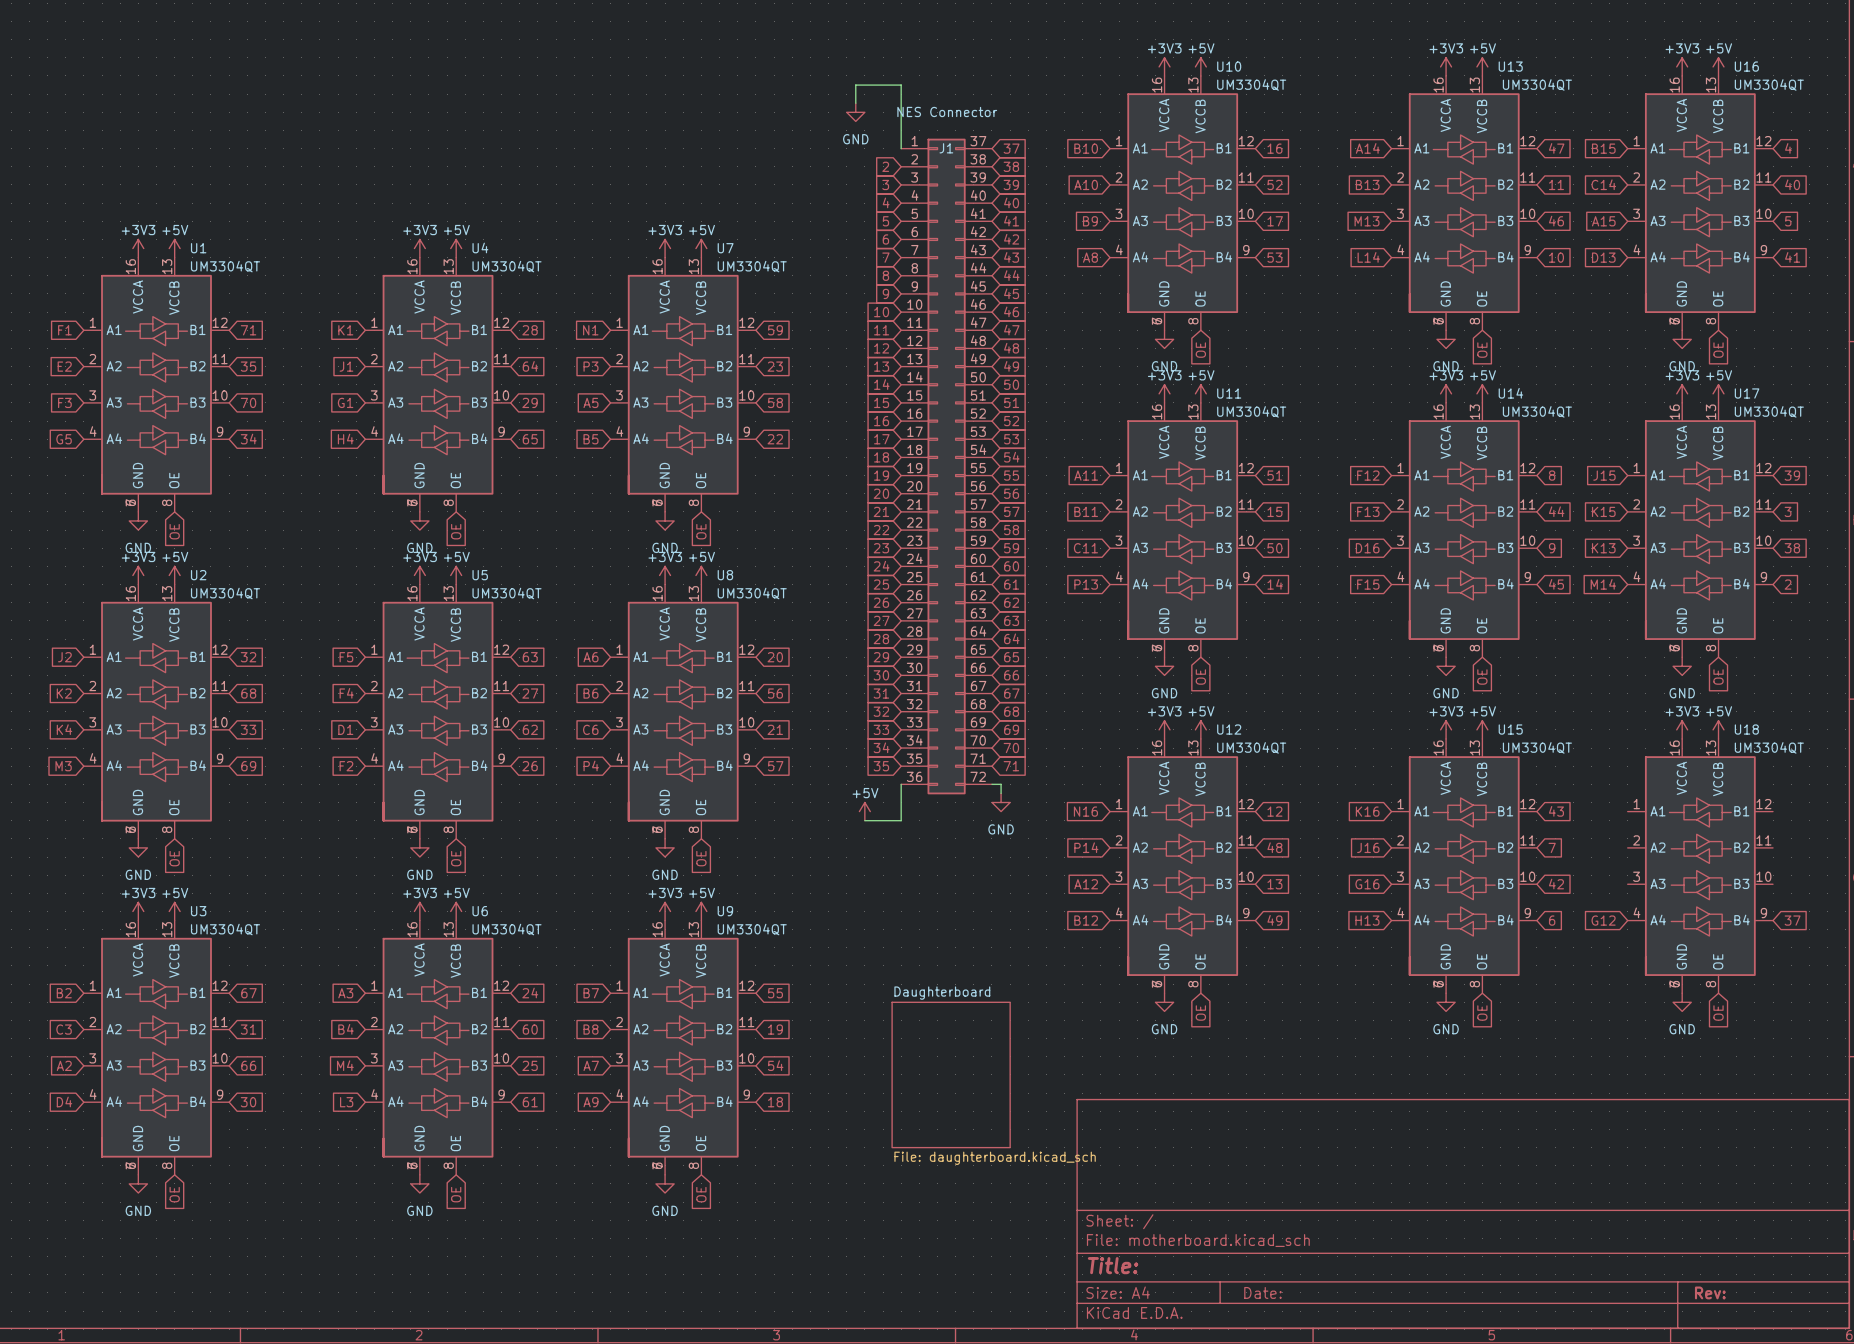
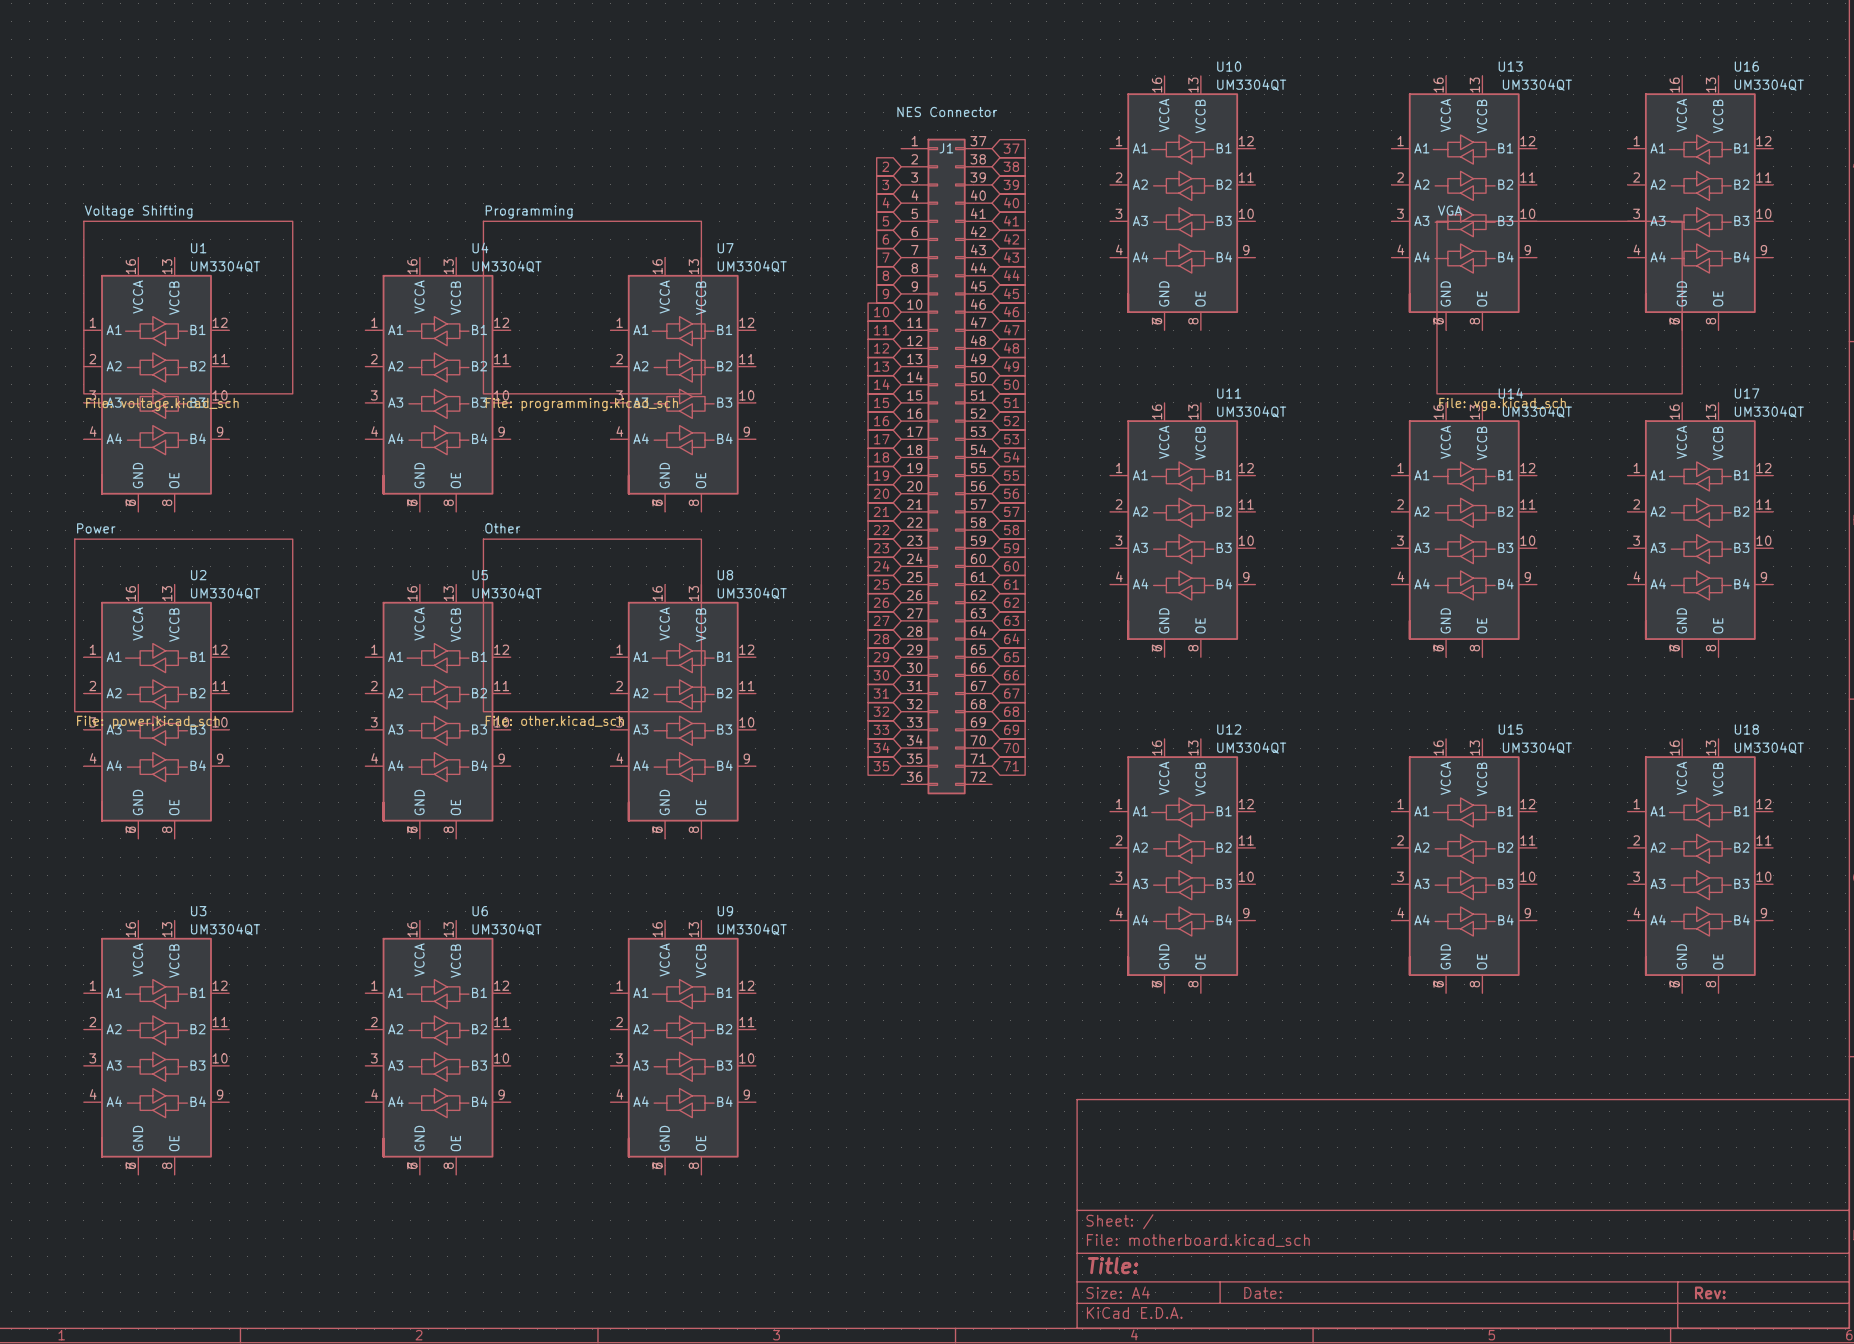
power symbol: +3V3 (1164, 66) -> none
power symbol: +5V (1200, 66) -> none
power symbol: +3V3 (1446, 66) -> none
power symbol: +5V (1482, 66) -> none
power symbol: +3V3 (1682, 66) -> none
power symbol: +5V (1718, 66) -> none
wire: (855, 103) (855, 85) (901, 85) (901, 148) -> none
power symbol: GND (855, 112) -> none
global label: B10 (1086, 148) -> none
global label: 16 (1274, 148) -> none
global label: A14 (1367, 148) -> none
global label: 47 (1556, 148) -> none
global label: B15 (1603, 148) -> none
global label: 4 (1788, 148) -> none
global label: A10 (1086, 184) -> none
global label: 52 (1274, 184) -> none
global label: B13 (1367, 184) -> none
global label: 11 (1556, 184) -> none
global label: C14 (1603, 184) -> none
global label: 40 (1792, 184) -> none
global label: B9 (1090, 221) -> none
global label: 17 (1275, 221) -> none
global label: M13 (1367, 221) -> none
global label: 46 (1556, 221) -> none
global label: A15 (1603, 221) -> none
global label: 5 (1788, 221) -> none
power symbol: +3V3 (138, 248) -> none
power symbol: +5V (174, 248) -> none
power symbol: +3V3 (419, 248) -> none
power symbol: +5V (456, 248) -> none
power symbol: +3V3 (665, 248) -> none
power symbol: +5V (701, 248) -> none
global label: A8 (1090, 257) -> none
global label: 53 (1274, 257) -> none
global label: L14 (1368, 257) -> none
global label: 10 (1556, 257) -> none
global label: D13 (1603, 257) -> none
global label: 41 (1792, 257) -> none
sheet Voltage Shifting: none -> File: voltage.kicad_sch (188, 307)
sheet Programming: none -> File: programming.kicad_sch (592, 307)
sheet VGA: none -> File: vga.kicad_sch (1559, 307)
global label: F1 (64, 330) -> none
global label: 71 (248, 330) -> none
global label: K1 (345, 330) -> none
global label: 28 (530, 330) -> none
global label: N1 (590, 330) -> none
global label: 59 (775, 330) -> none
power symbol: GND (1164, 339) -> none
power symbol: GND (1446, 339) -> none
power symbol: GND (1682, 339) -> none
global label: OE (1200, 350) -> none
global label: OE (1482, 350) -> none
global label: OE (1718, 350) -> none
global label: E2 (64, 366) -> none
global label: 35 (248, 366) -> none
global label: J1 (346, 366) -> none
global label: 64 (530, 366) -> none
global label: P3 (590, 366) -> none
global label: 23 (775, 366) -> none
power symbol: +3V3 (1164, 393) -> none
power symbol: +5V (1200, 393) -> none
power symbol: +3V3 (1446, 393) -> none
power symbol: +5V (1482, 393) -> none
power symbol: +3V3 (1682, 393) -> none
power symbol: +5V (1718, 393) -> none
global label: F3 (64, 402) -> none
global label: 70 (248, 402) -> none
global label: G1 (345, 402) -> none
global label: 29 (530, 402) -> none
global label: A5 (590, 402) -> none
global label: 58 (775, 402) -> none
global label: G5 (64, 439) -> none
global label: 34 (248, 439) -> none
global label: H4 (345, 439) -> none
global label: 65 (530, 439) -> none
global label: B5 (590, 439) -> none
global label: 22 (775, 439) -> none
global label: A11 (1086, 475) -> none
global label: 51 (1274, 475) -> none
global label: F12 (1368, 475) -> none
global label: 8 (1552, 475) -> none
global label: J15 (1604, 475) -> none
global label: 39 (1792, 475) -> none
global label: B11 (1086, 511) -> none
global label: 15 (1274, 511) -> none
global label: F13 (1368, 511) -> none
global label: 44 (1556, 511) -> none
global label: K15 (1603, 511) -> none
global label: 3 (1788, 511) -> none
power symbol: GND (138, 520) -> none
power symbol: GND (419, 520) -> none
power symbol: GND (665, 520) -> none
global label: OE (174, 531) -> none
global label: OE (456, 531) -> none
global label: OE (701, 531) -> none
global label: C11 (1085, 548) -> none
global label: 50 (1274, 548) -> none
global label: D16 (1367, 548) -> none
global label: 9 (1552, 548) -> none
global label: K13 (1603, 548) -> none
global label: 38 (1792, 548) -> none
power symbol: +3V3 (138, 575) -> none
power symbol: +5V (174, 575) -> none
power symbol: +3V3 (419, 575) -> none
power symbol: +5V (456, 575) -> none
power symbol: +3V3 (665, 575) -> none
power symbol: +5V (701, 575) -> none
global label: P13 (1086, 584) -> none
global label: 14 (1275, 584) -> none
global label: F15 (1368, 584) -> none
global label: 45 (1556, 584) -> none
global label: M14 (1603, 584) -> none
global label: 2 (1788, 584) -> none
sheet Power: none -> File: power.kicad_sch (183, 625)
sheet Other: none -> File: other.kicad_sch (592, 625)
global label: J2 (64, 657) -> none
global label: 32 (248, 657) -> none
global label: F5 (346, 657) -> none
global label: 63 (530, 657) -> none
global label: A6 (590, 657) -> none
global label: 20 (775, 657) -> none
power symbol: GND (1164, 666) -> none
power symbol: GND (1446, 666) -> none
power symbol: GND (1682, 666) -> none
global label: OE (1200, 677) -> none
global label: OE (1482, 677) -> none
global label: OE (1718, 677) -> none
global label: K2 (64, 693) -> none
global label: 68 (248, 693) -> none
global label: F4 (346, 693) -> none
global label: 27 (530, 693) -> none
global label: B6 (590, 693) -> none
global label: 56 (775, 693) -> none
global label: K4 (64, 729) -> none
global label: 33 (248, 729) -> none
global label: D1 (345, 729) -> none
global label: 62 (530, 729) -> none
global label: C6 (590, 729) -> none
global label: 21 (775, 729) -> none
power symbol: +3V3 (1164, 729) -> none
power symbol: +5V (1200, 729) -> none
power symbol: +3V3 (1446, 729) -> none
power symbol: +5V (1482, 729) -> none
power symbol: +3V3 (1682, 729) -> none
power symbol: +5V (1718, 729) -> none
global label: P4 (591, 765) -> none
global label: M3 (63, 766) -> none
global label: 69 (248, 766) -> none
global label: F2 (346, 766) -> none
global label: 26 (530, 766) -> none
global label: 57 (775, 766) -> none
wire: (901, 784) (901, 820) (864, 820) -> none
wire: (991, 784) (1001, 784) (1001, 793) -> none
power symbol: GND (1001, 802) -> none
power symbol: +5V (864, 811) -> none
global label: N16 (1085, 811) -> none
global label: 12 (1274, 811) -> none
global label: K16 (1367, 811) -> none
global label: 43 (1556, 811) -> none
power symbol: GND (138, 847) -> none
power symbol: GND (419, 847) -> none
power symbol: GND (665, 847) -> none
global label: P14 (1086, 847) -> none
global label: 48 (1274, 847) -> none
global label: J16 (1368, 847) -> none
global label: 7 (1552, 847) -> none
global label: OE (174, 858) -> none
global label: OE (456, 858) -> none
global label: OE (701, 858) -> none
global label: A12 (1086, 884) -> none
global label: 13 (1274, 884) -> none
global label: G16 (1367, 884) -> none
global label: 42 (1556, 884) -> none
power symbol: +3V3 (138, 911) -> none
power symbol: +5V (174, 911) -> none
power symbol: +3V3 (419, 911) -> none
power symbol: +5V (456, 911) -> none
power symbol: +3V3 (665, 911) -> none
power symbol: +5V (701, 911) -> none
global label: B12 (1086, 920) -> none
global label: 49 (1274, 920) -> none
global label: H13 (1367, 920) -> none
global label: 6 (1552, 920) -> none
global label: G12 (1603, 920) -> none
global label: 37 (1792, 920) -> none
global label: B2 (64, 993) -> none
global label: 67 (248, 993) -> none
global label: A3 (345, 993) -> none
global label: 24 (530, 993) -> none
global label: B7 (591, 993) -> none
global label: 55 (775, 993) -> none
power symbol: GND (1164, 1002) -> none
power symbol: GND (1446, 1002) -> none
power symbol: GND (1682, 1002) -> none
global label: OE (1200, 1013) -> none
global label: OE (1482, 1013) -> none
global label: OE (1718, 1013) -> none
global label: C3 (64, 1029) -> none
global label: 31 (248, 1029) -> none
global label: B4 (346, 1029) -> none
global label: 60 (530, 1029) -> none
global label: B8 (590, 1029) -> none
global label: 19 (775, 1029) -> none
global label: A2 (64, 1065) -> none
global label: 66 (248, 1065) -> none
global label: M4 (345, 1065) -> none
global label: 25 (530, 1065) -> none
global label: A7 (591, 1065) -> none
global label: 54 (775, 1065) -> none
sheet Daughterboard: File: daughterboard.kicad_sch (951, 1074) -> none
global label: D4 (64, 1101) -> none
global label: 30 (248, 1102) -> none
global label: L3 (346, 1102) -> none
global label: 61 (530, 1102) -> none
global label: A9 (590, 1102) -> none
global label: 18 (775, 1102) -> none
power symbol: GND (138, 1183) -> none
power symbol: GND (419, 1183) -> none
power symbol: GND (665, 1183) -> none
global label: OE (174, 1194) -> none
global label: OE (456, 1194) -> none
global label: OE (701, 1194) -> none

